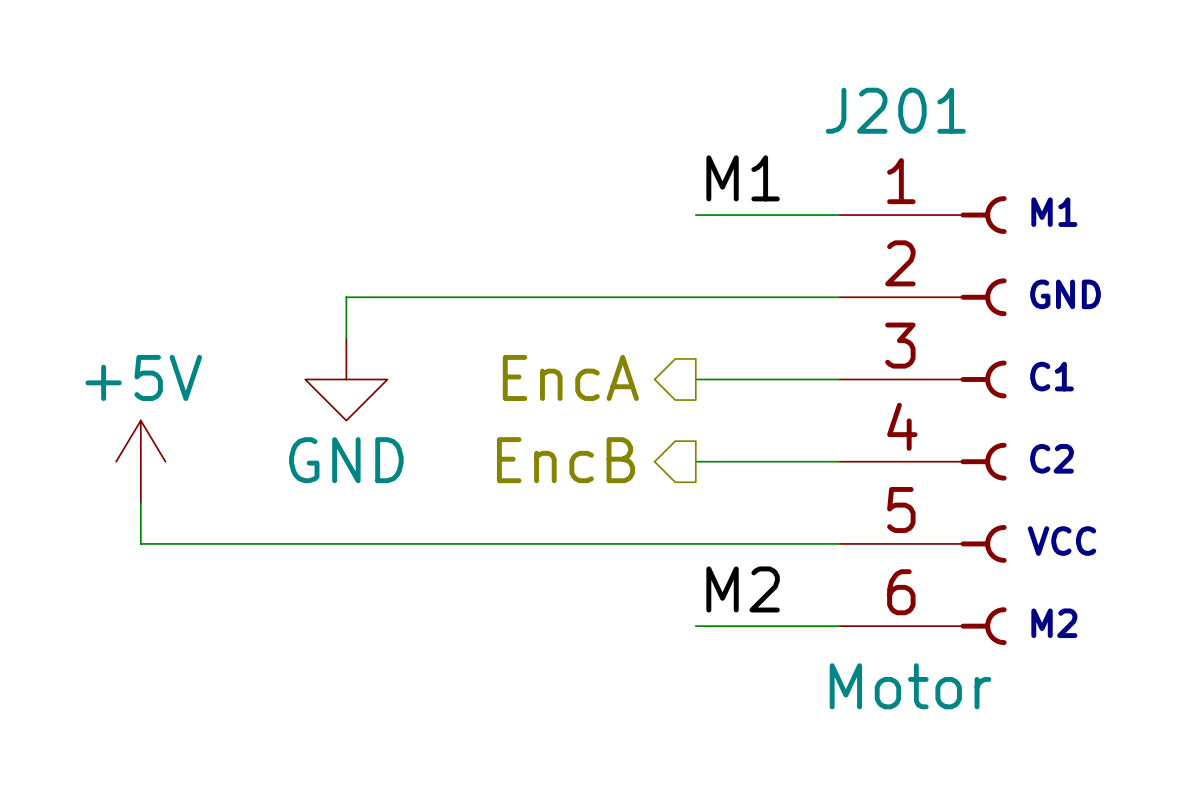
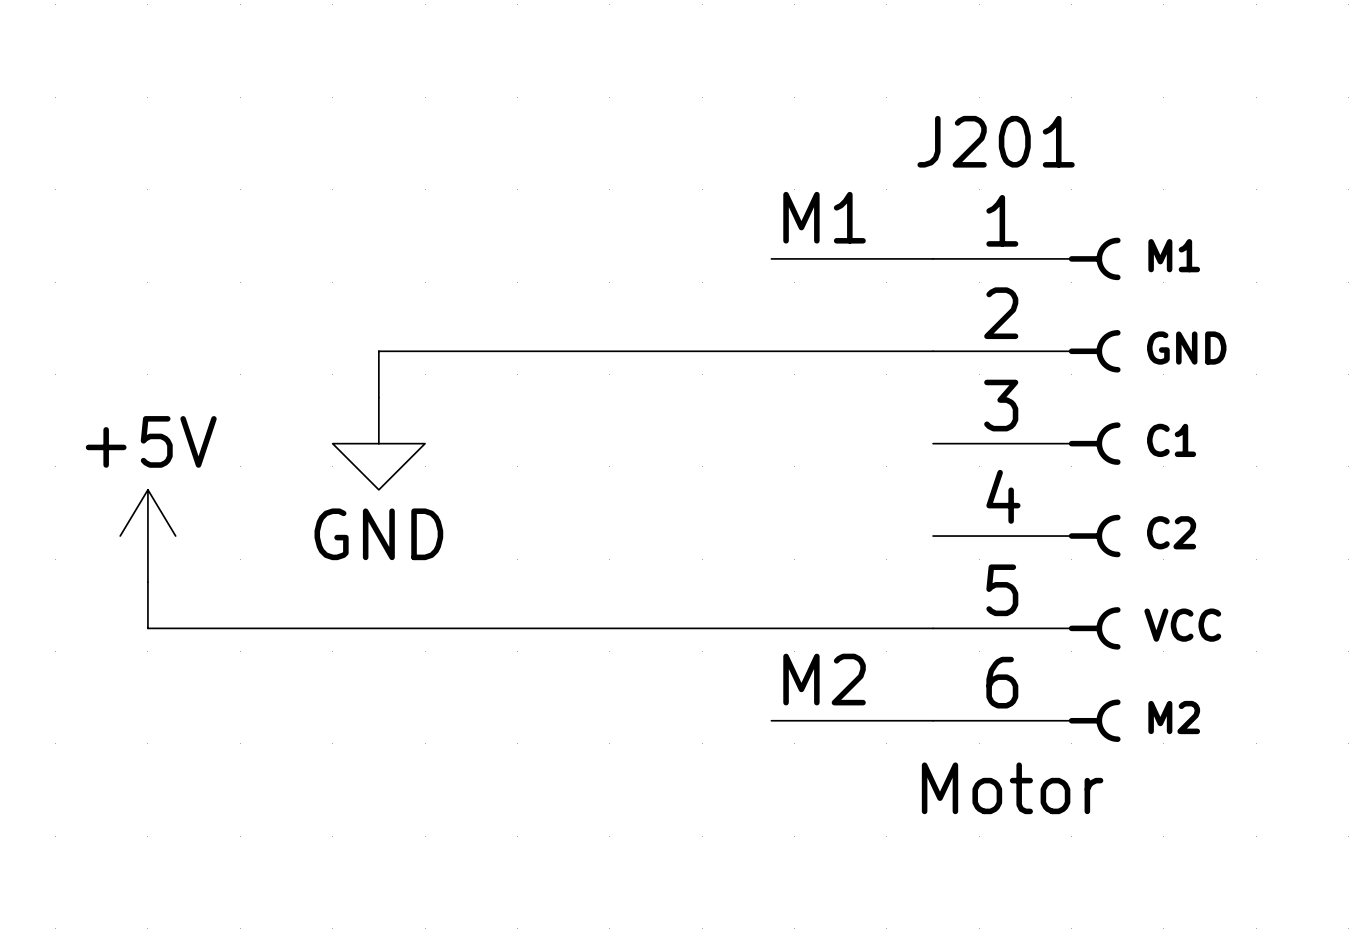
hierarchical label: EncA (570, 377) -> none
wire: (695, 379) (839, 379) -> none
hierarchical label: EncB (565, 460) -> none
wire: (695, 461) (839, 461) -> none

